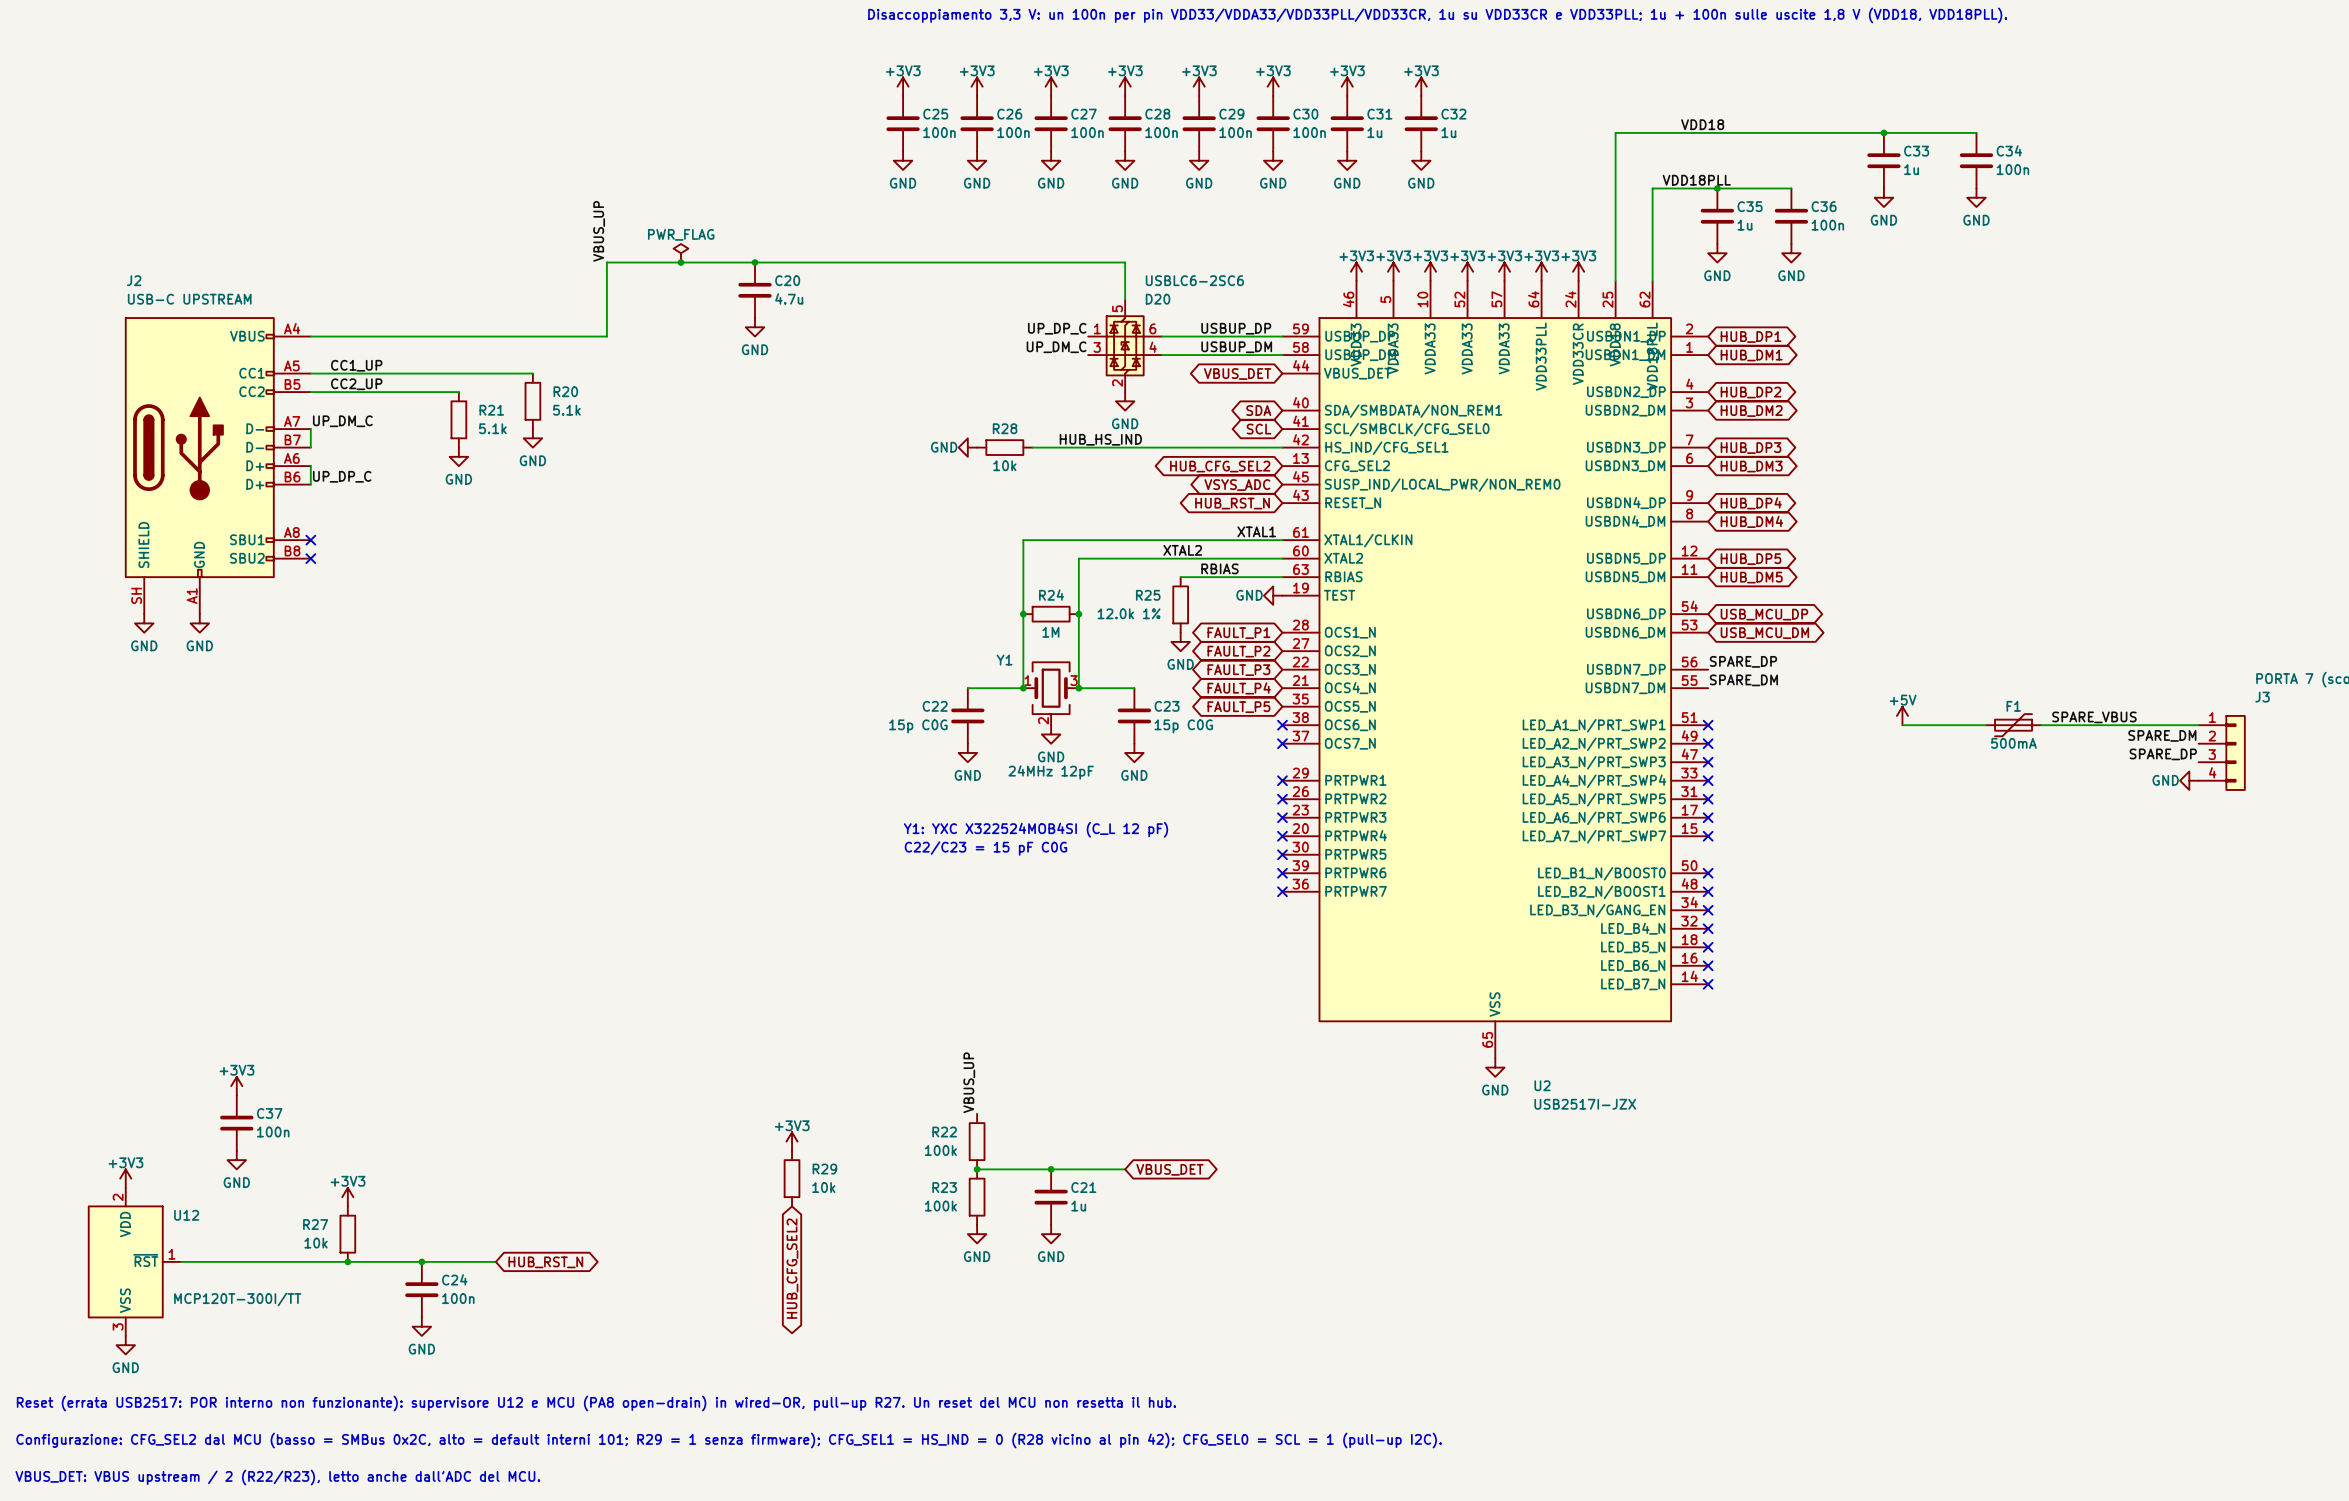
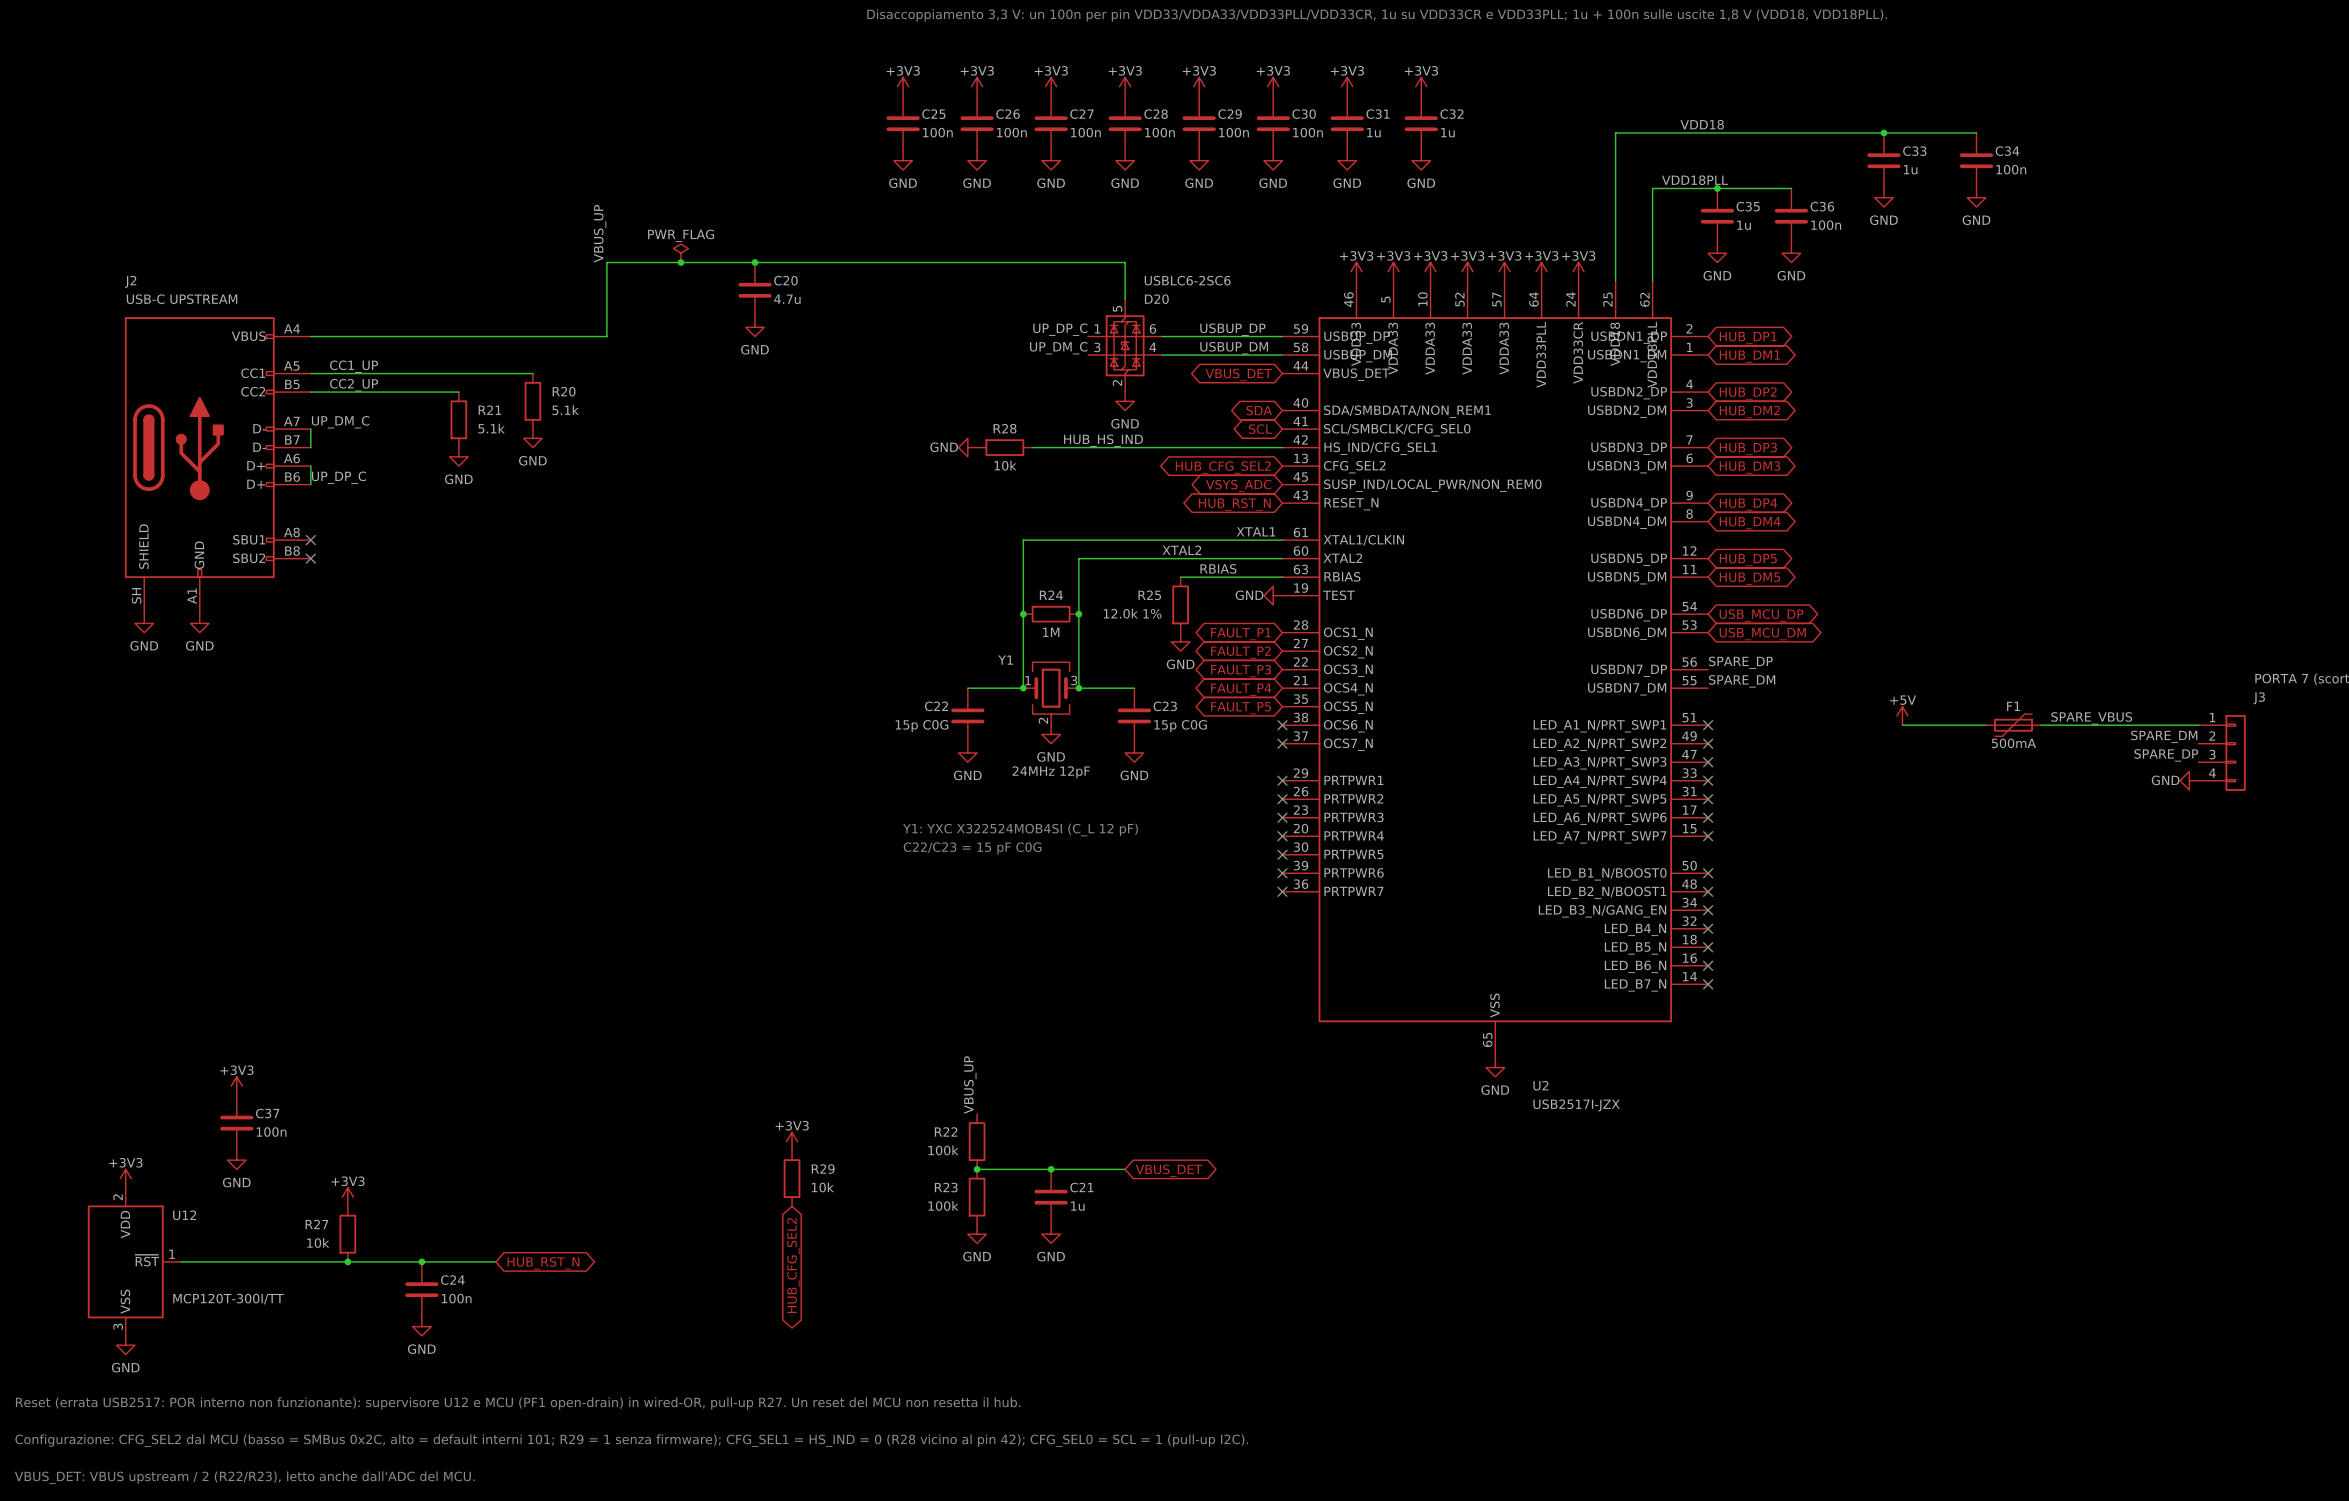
text: Reset (errata USB2517: POR interno non funzionante): supervisore U12 e MCU (PA8 open-drain) in wired-OR, pull-up R27. Un reset del MCU non resetta il hub. (596, 1403) -> Reset (errata USB2517: POR interno non funzionante): supervisore U12 e MCU (PF1 open-drain) in wired-OR, pull-up R27. Un reset del MCU non resetta il hub. (518, 1403)

